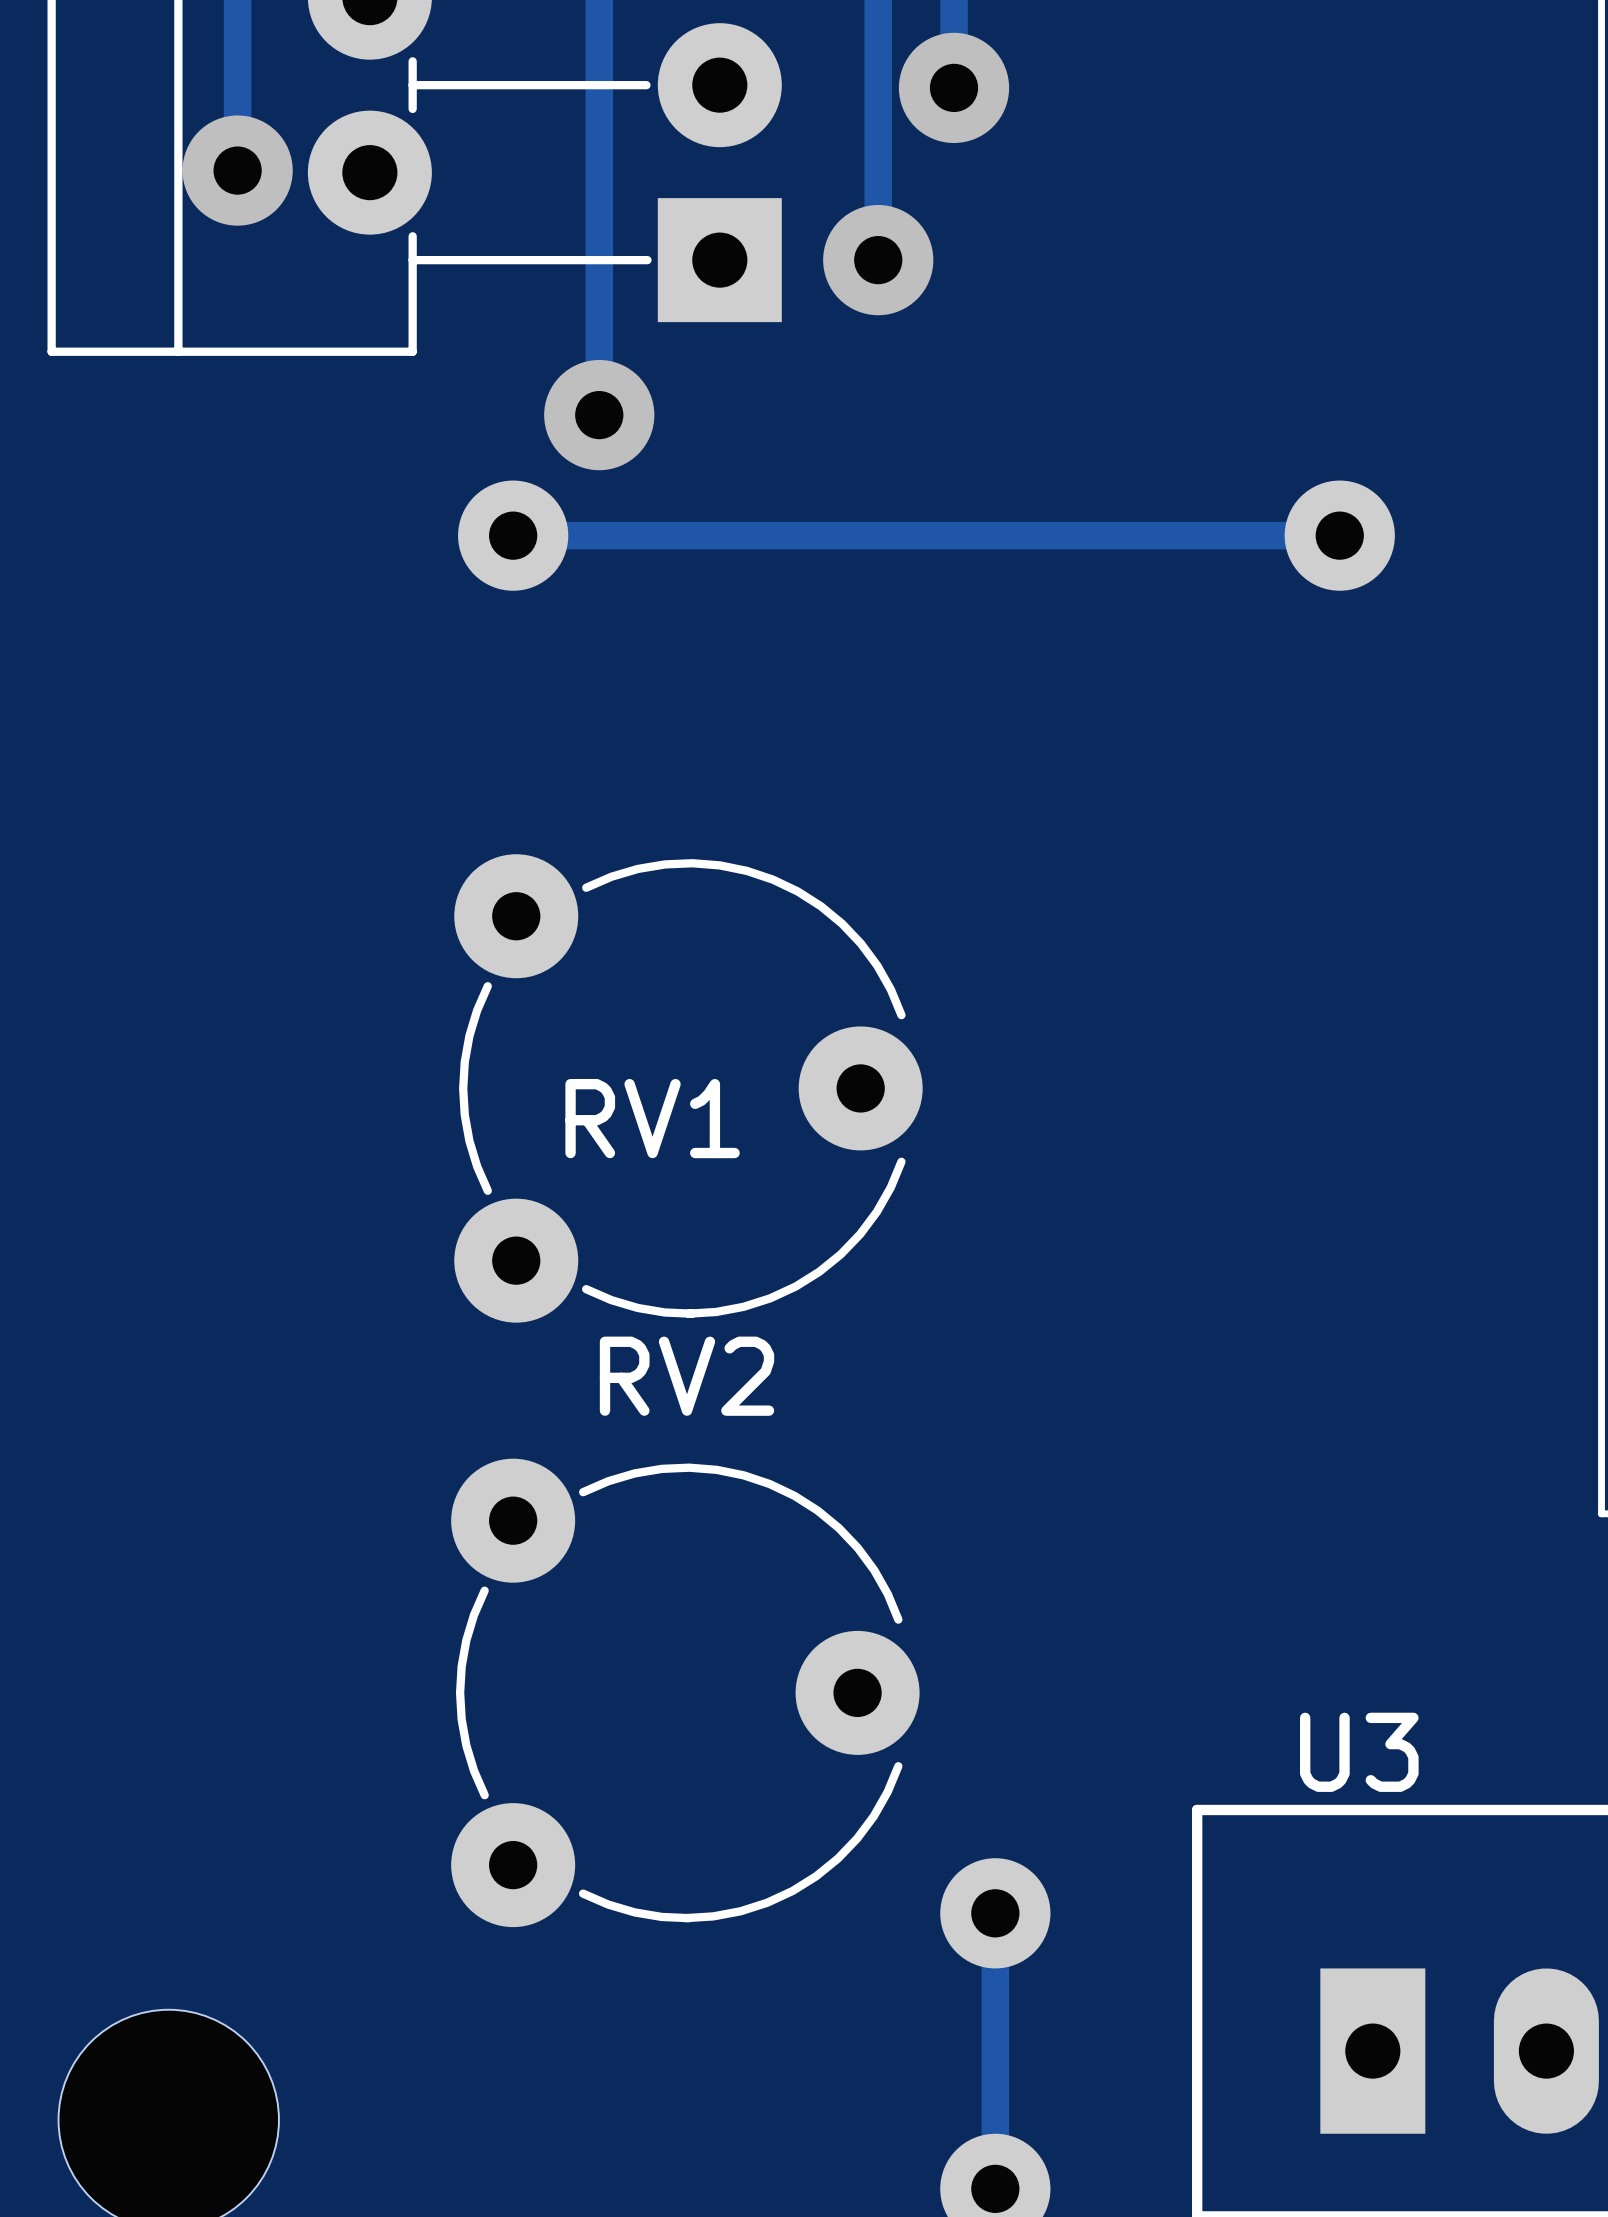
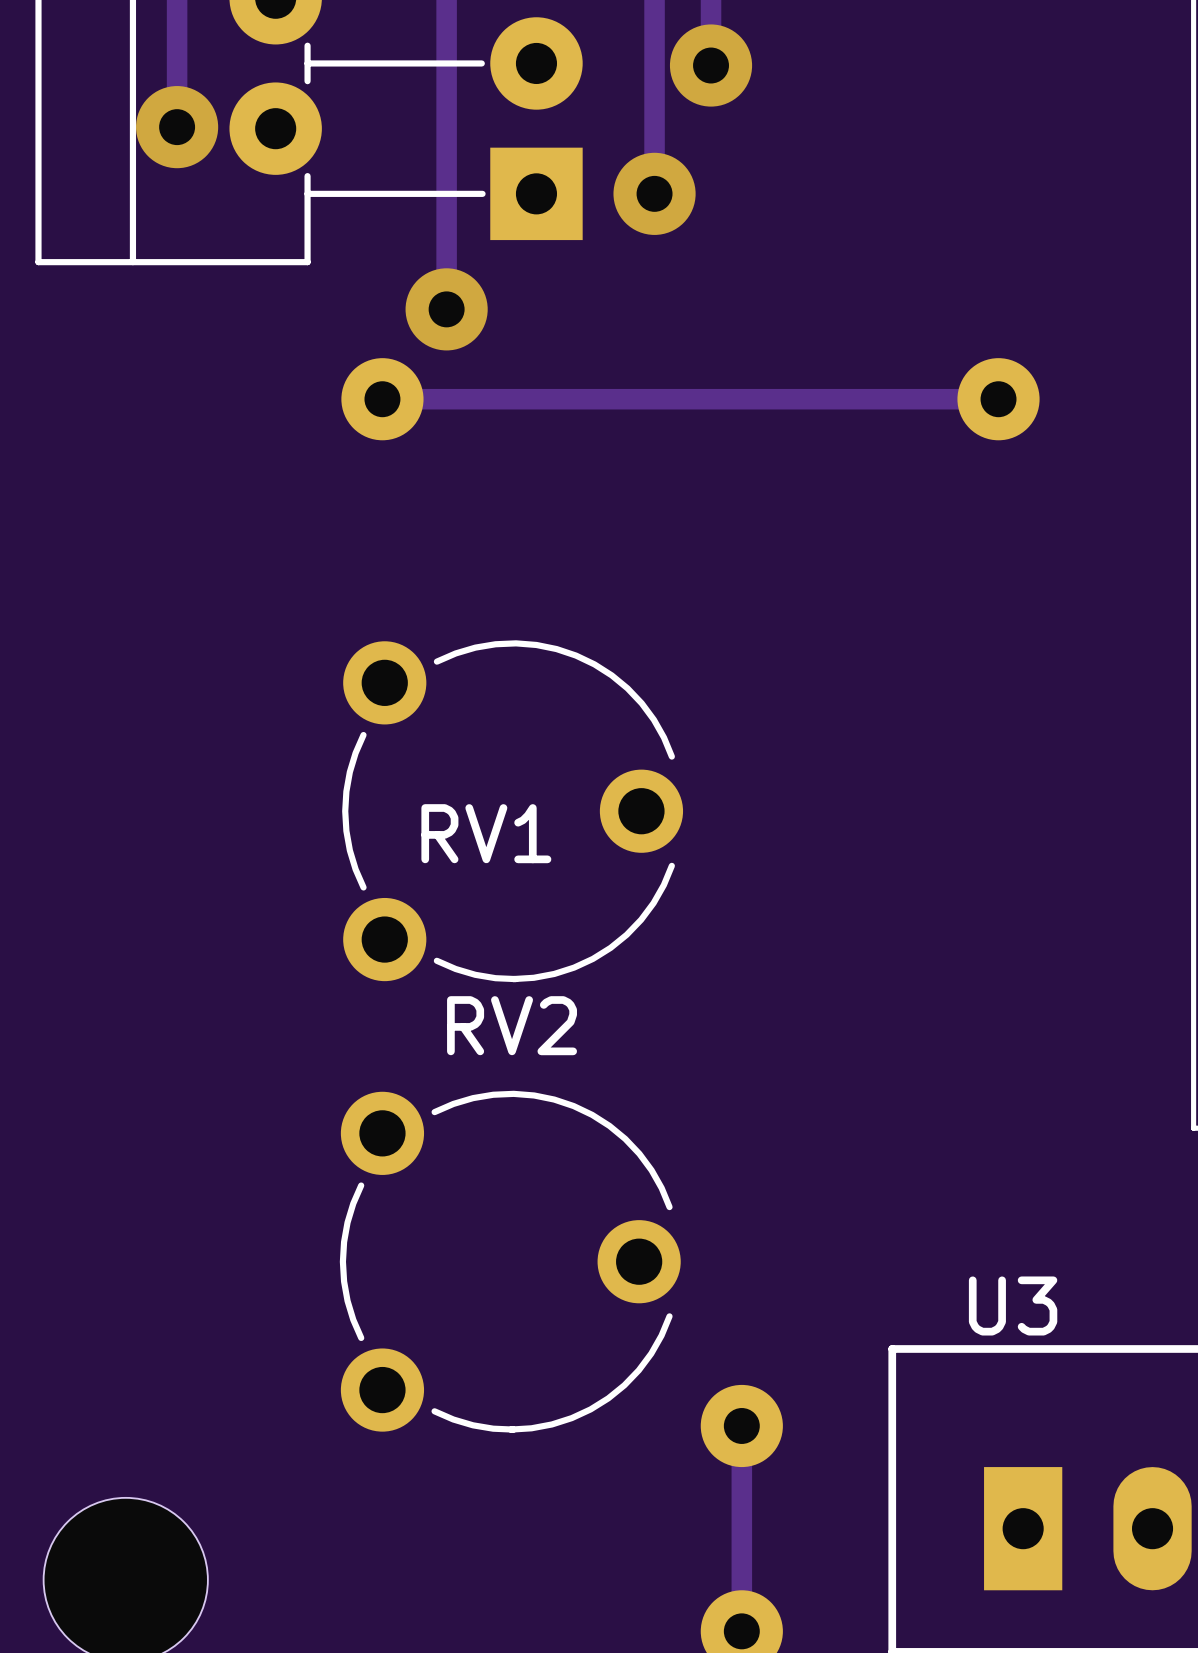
RV1 footprint: [454, 854, 923, 1323] -> [342, 640, 684, 983]
RV2 footprint: [451, 1458, 920, 1928] -> [339, 1090, 681, 1433]

